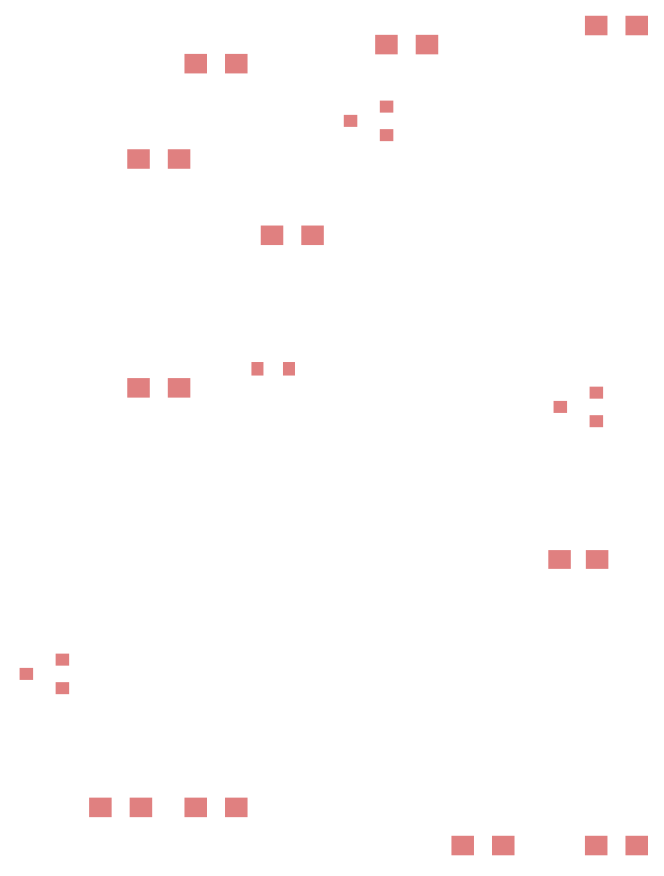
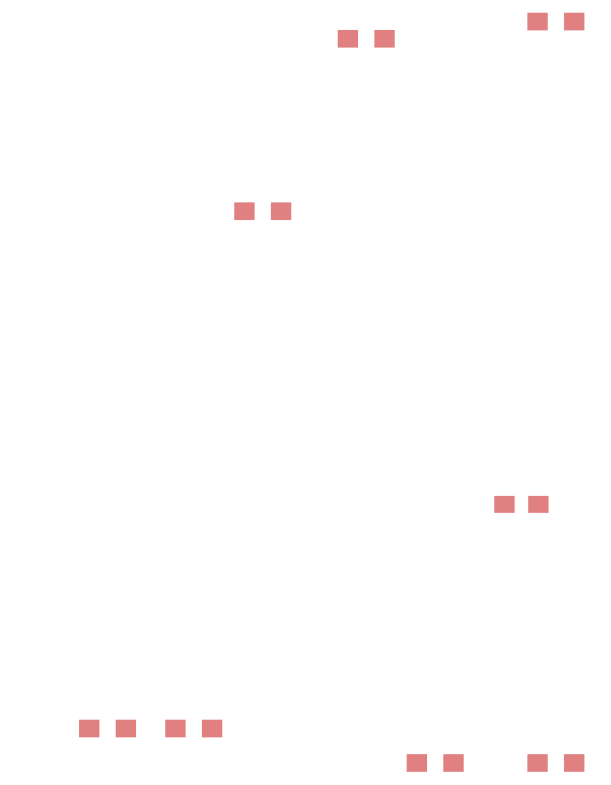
part: (216, 63) -> none
part: (368, 120) -> none
part: (158, 159) -> none
part: (273, 368) -> none
part: (158, 387) -> none
part: (578, 406) -> none
part: (44, 673) -> none

